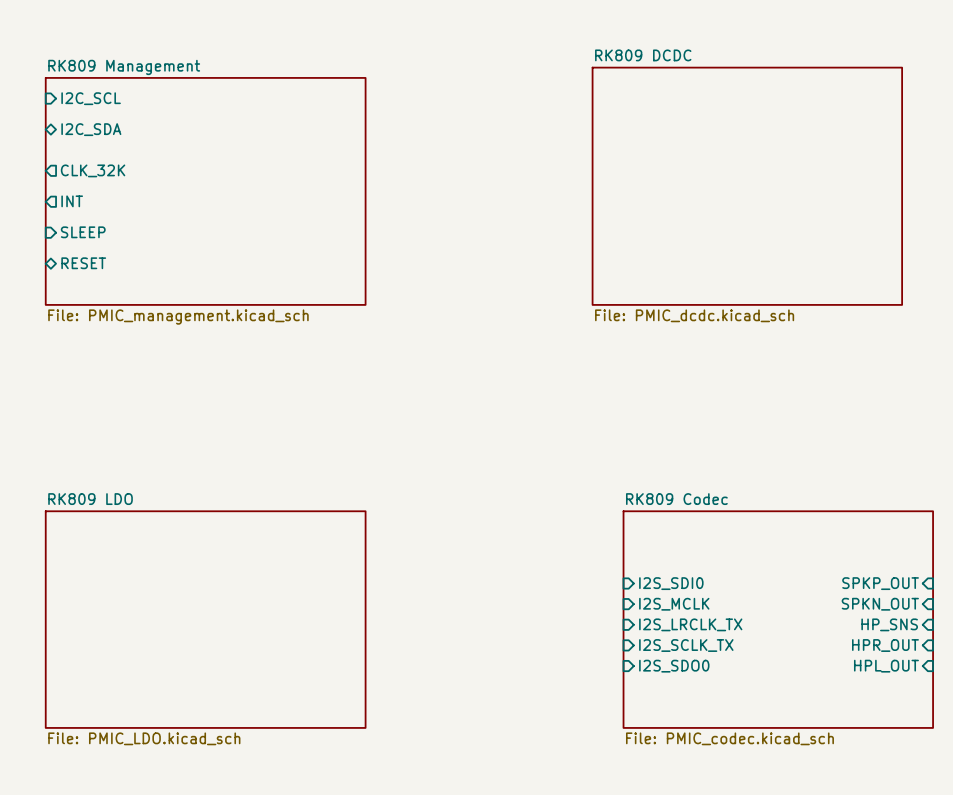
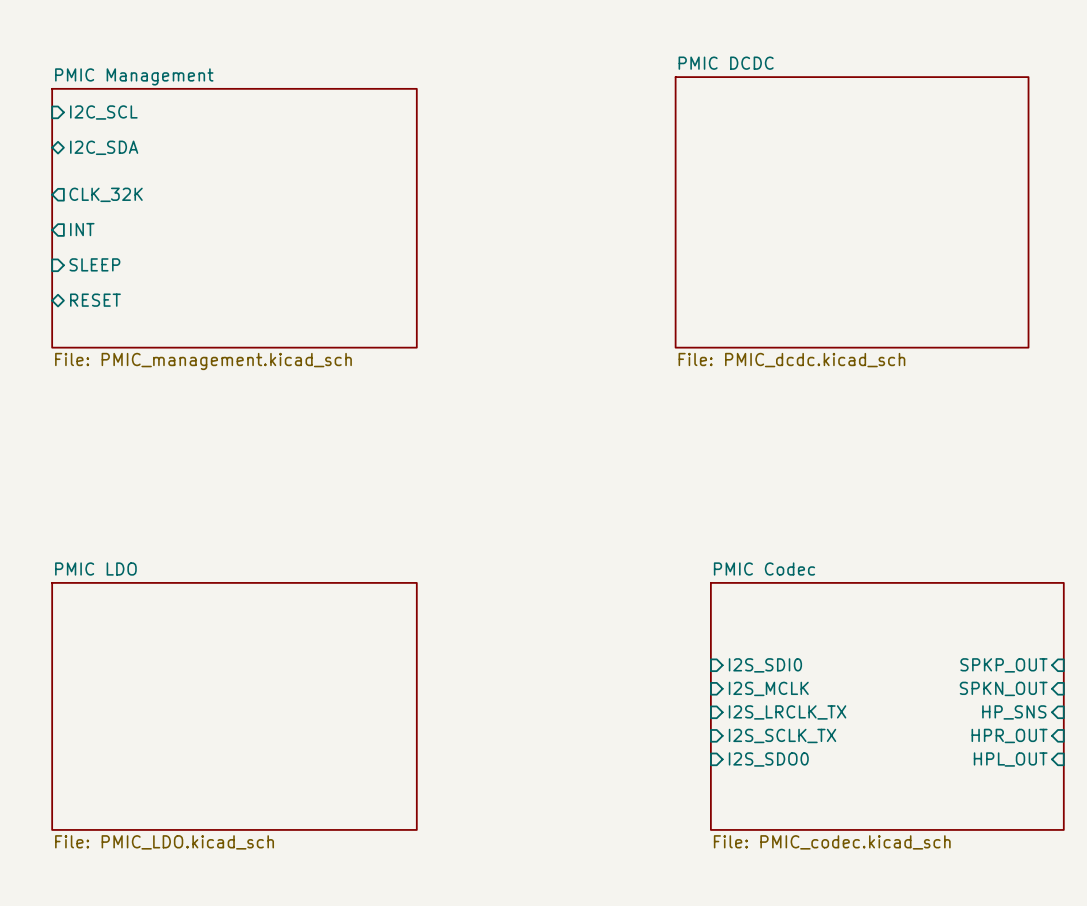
sheet RK809 DCDC name: RK809 DCDC (643, 55) -> PMIC DCDC (726, 63)
sheet RK809 Management name: RK809 Management (124, 67) -> PMIC Management (134, 76)
sheet RK809 LDO name: RK809 LDO (90, 499) -> PMIC LDO (95, 569)
sheet RK809 Codec name: RK809 Codec (676, 499) -> PMIC Codec (764, 569)

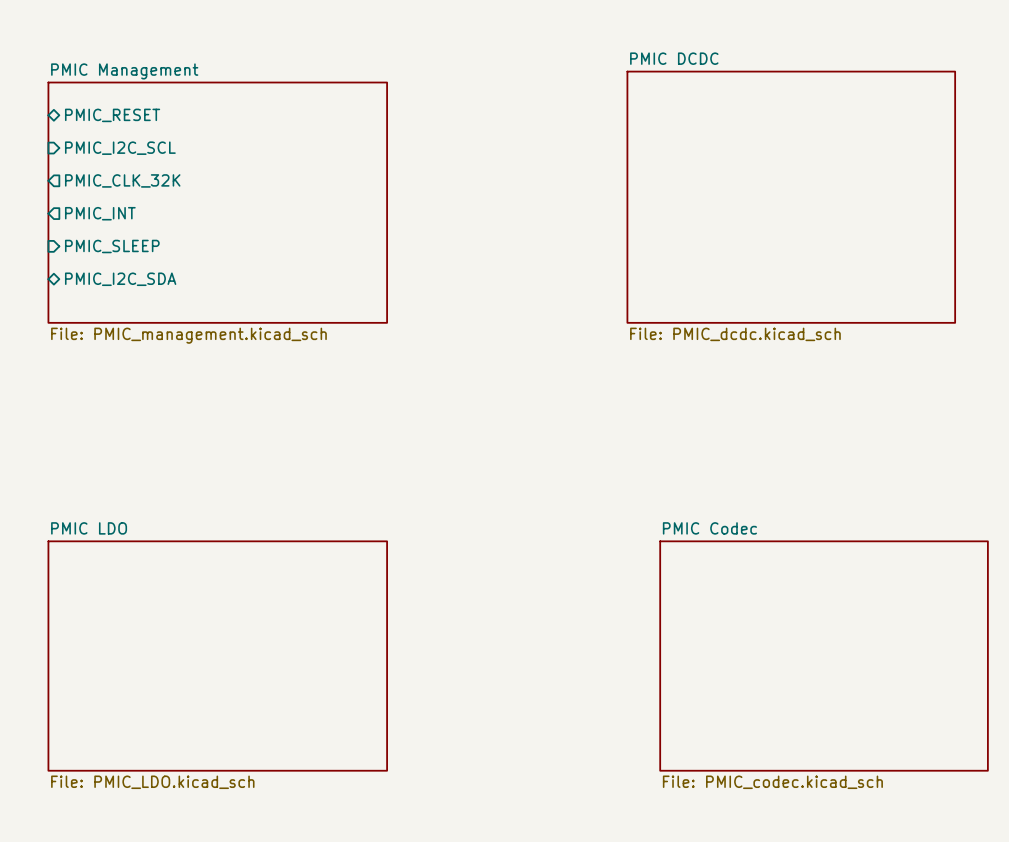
sheet pin: I2C_SCL (103, 112) -> none
sheet pin: none -> PMIC_RESET (112, 115)
sheet pin: I2C_SDA (104, 147) -> none
sheet pin: none -> PMIC_I2C_SCL (120, 148)
sheet pin: CLK_32K (106, 194) -> PMIC_CLK_32K (122, 180)
sheet pin: INT (82, 229) -> PMIC_INT (100, 213)
sheet pin: SLEEP (94, 264) -> PMIC_SLEEP (112, 246)
sheet pin: RESET (95, 300) -> PMIC_I2C_SDA (120, 279)
sheet pin: I2S_SDI0 (765, 665) -> none
sheet pin: SPKP_OUT (1003, 665) -> none
sheet pin: I2S_MCLK (768, 688) -> none
sheet pin: SPKN_OUT (1003, 688) -> none
sheet pin: I2S_LRCLK_TX (787, 712) -> none
sheet pin: HP_SNS (1014, 712) -> none
sheet pin: I2S_SCLK_TX (782, 735) -> none
sheet pin: HPR_OUT (1009, 735) -> none
sheet pin: I2S_SDO0 (768, 759) -> none
sheet pin: HPL_OUT (1010, 759) -> none

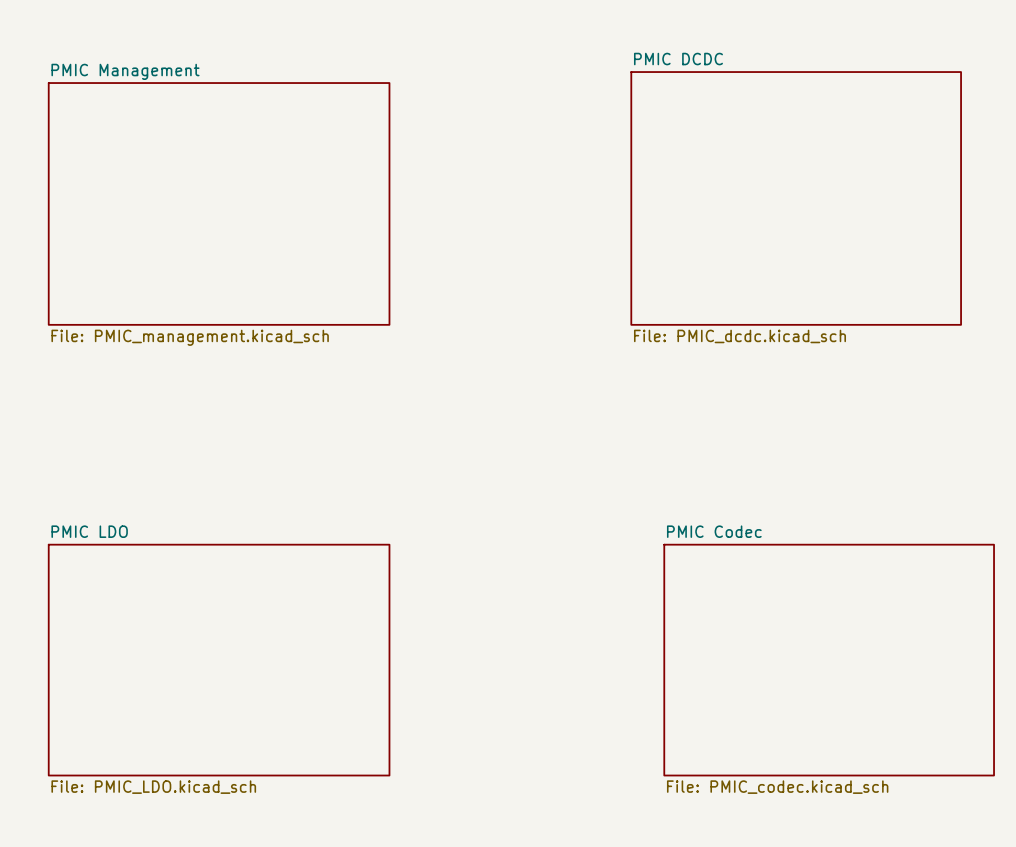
sheet pin: PMIC_RESET (112, 115) -> none
sheet pin: PMIC_I2C_SCL (120, 148) -> none
sheet pin: PMIC_CLK_32K (122, 180) -> none
sheet pin: PMIC_INT (100, 213) -> none
sheet pin: PMIC_SLEEP (112, 246) -> none
sheet pin: PMIC_I2C_SDA (120, 279) -> none

